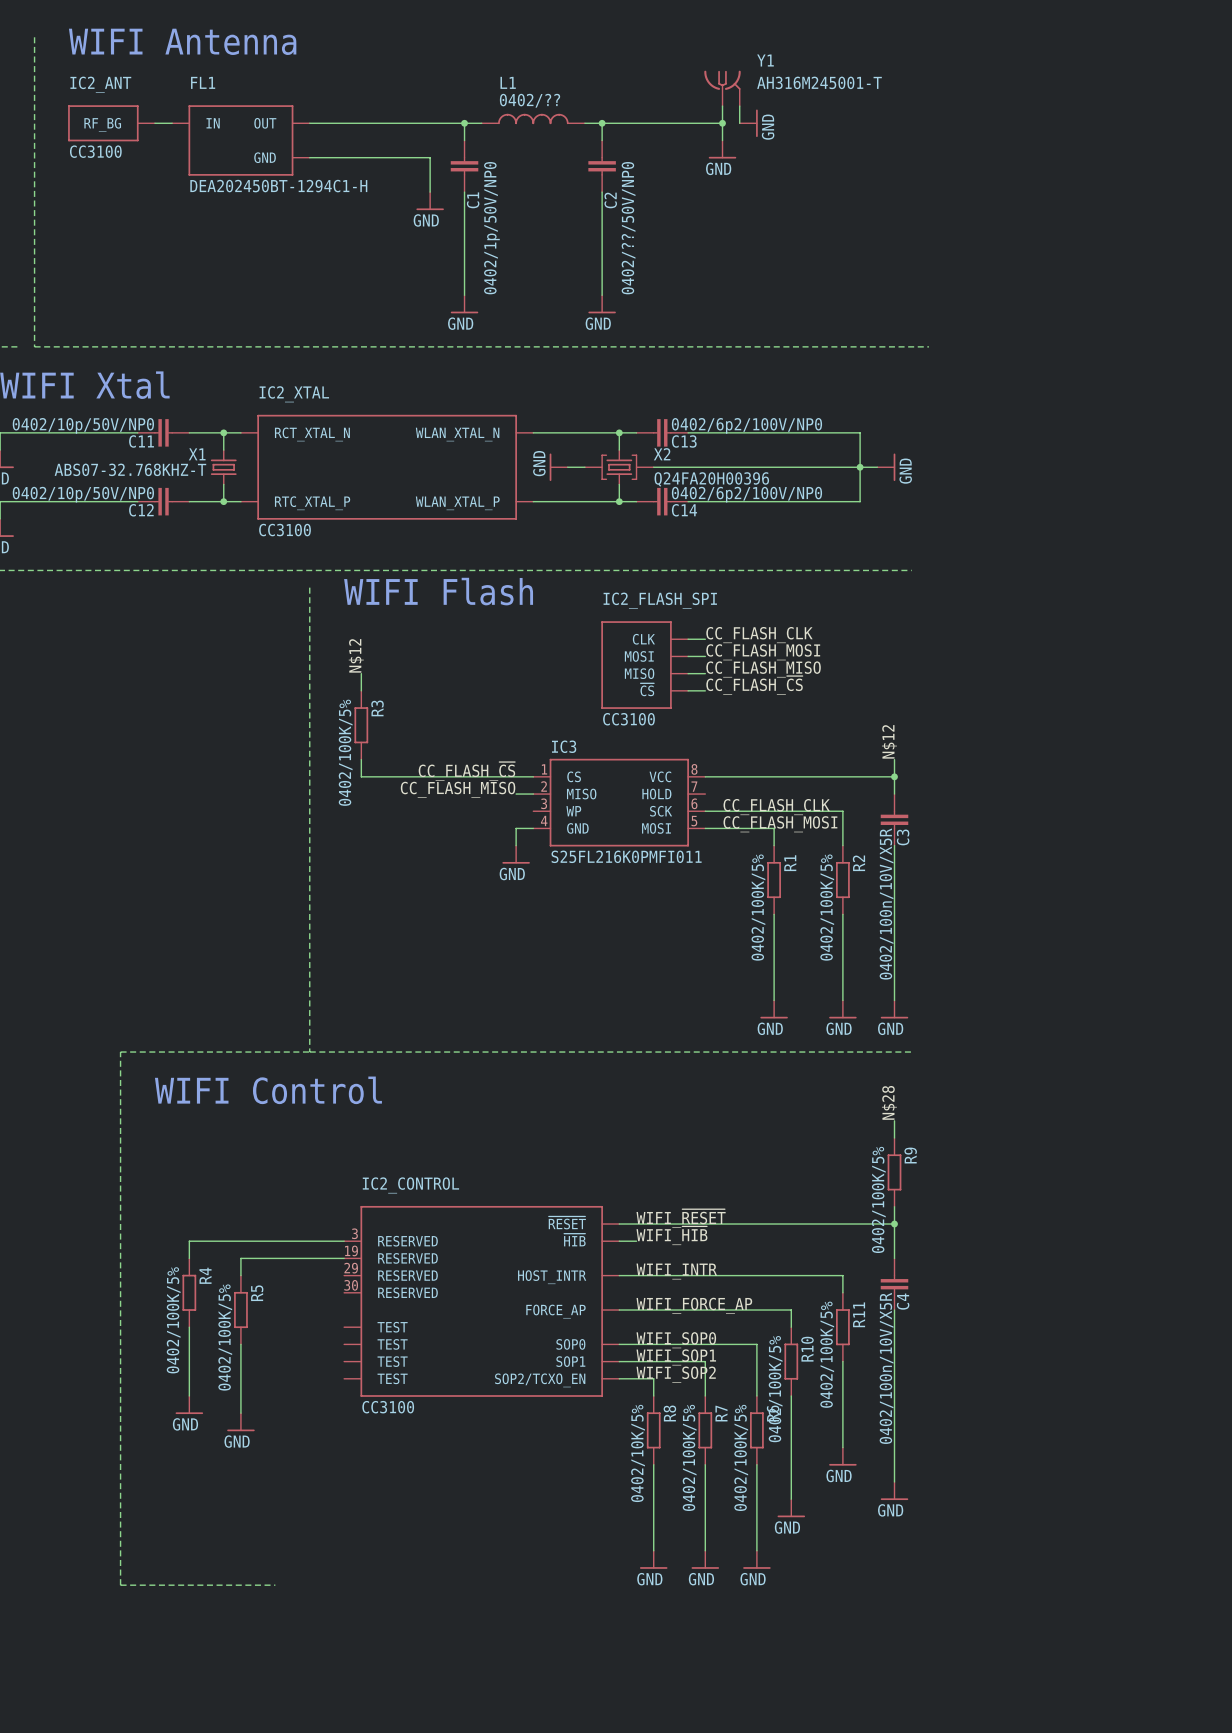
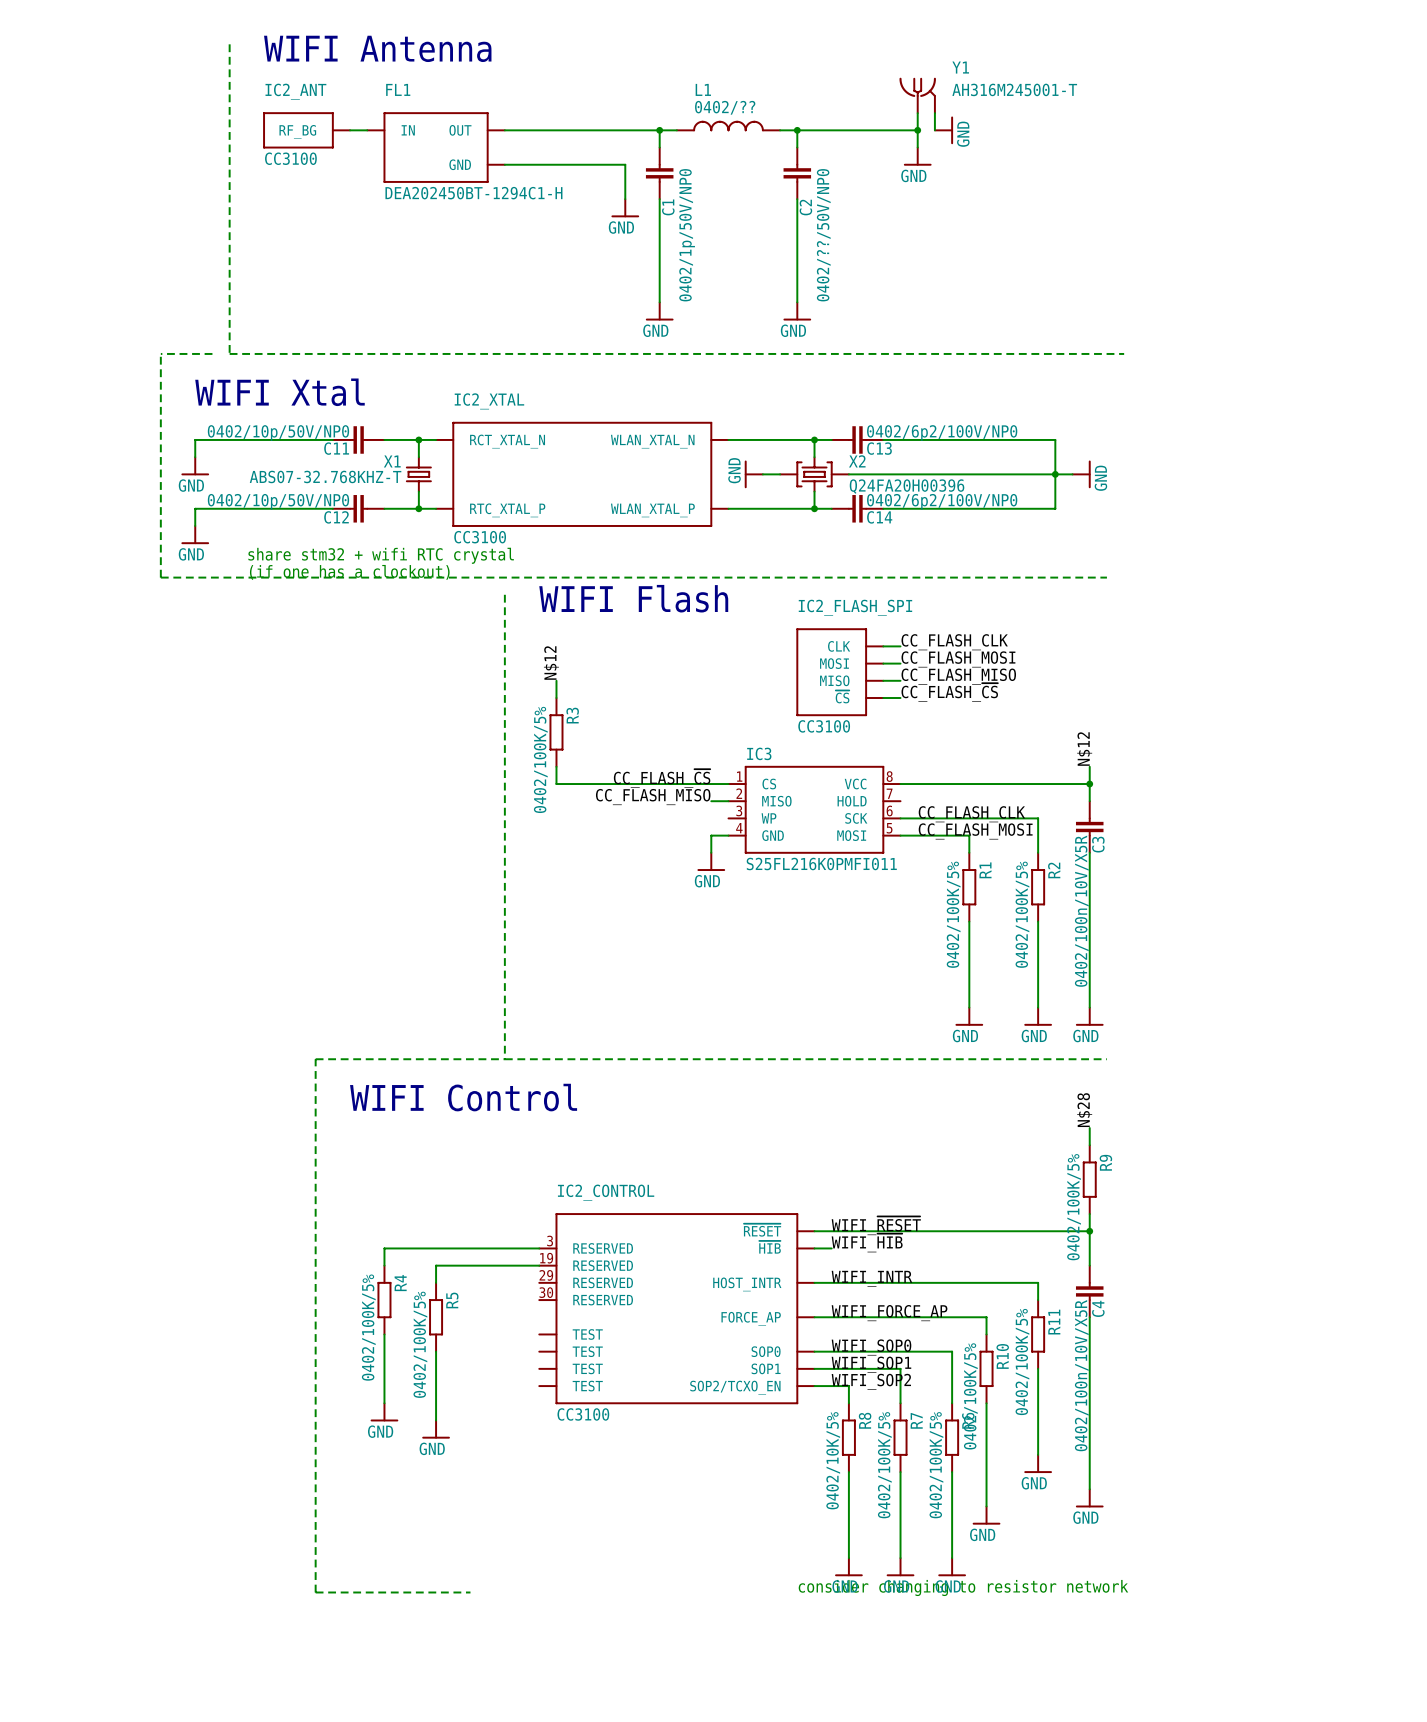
text: none -> share stm32 + wifi RTC crystal (381, 555)
text: none -> (if one has a clockout) (349, 572)
text: none -> consider changing to resistor network (963, 1587)

